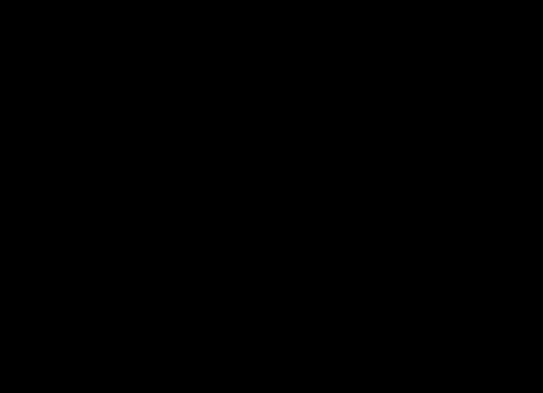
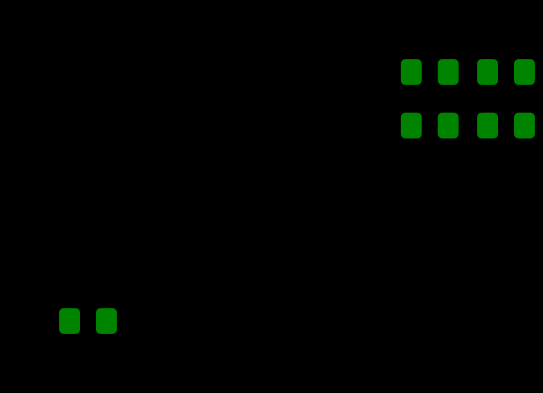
part: none -> (429, 72)
part: none -> (506, 72)
part: none -> (429, 125)
part: none -> (506, 125)
part: none -> (88, 321)

